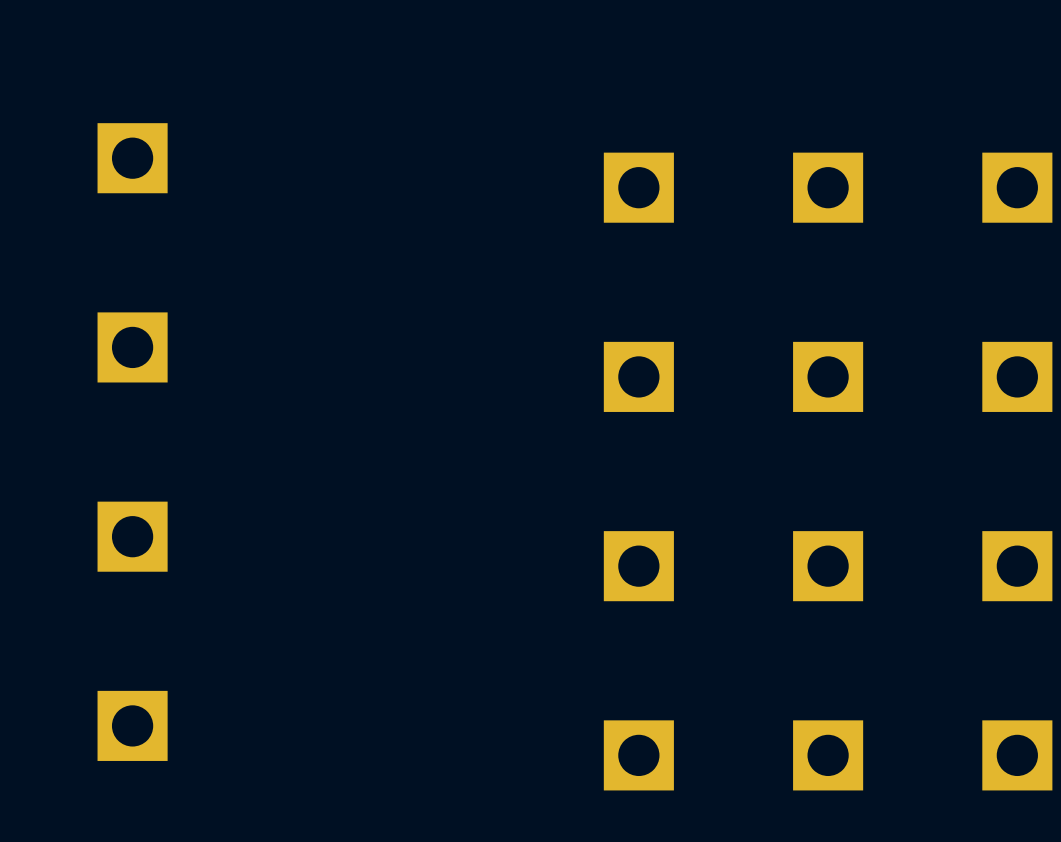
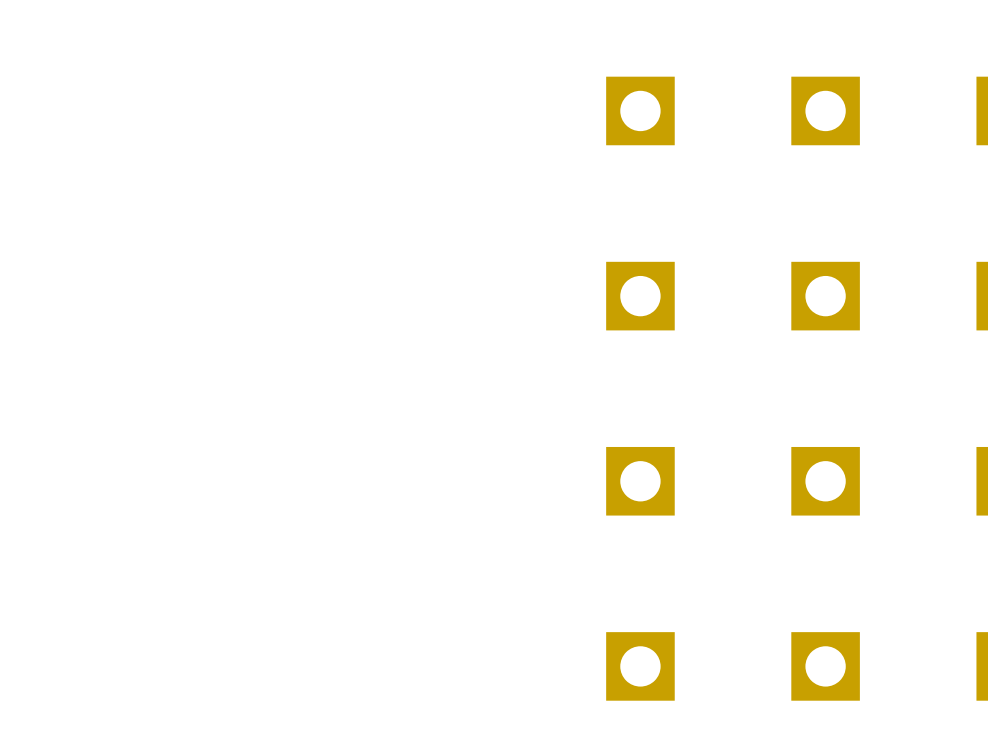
part: (132, 158) -> none
part: (132, 347) -> none
part: (132, 536) -> none
part: (132, 725) -> none

